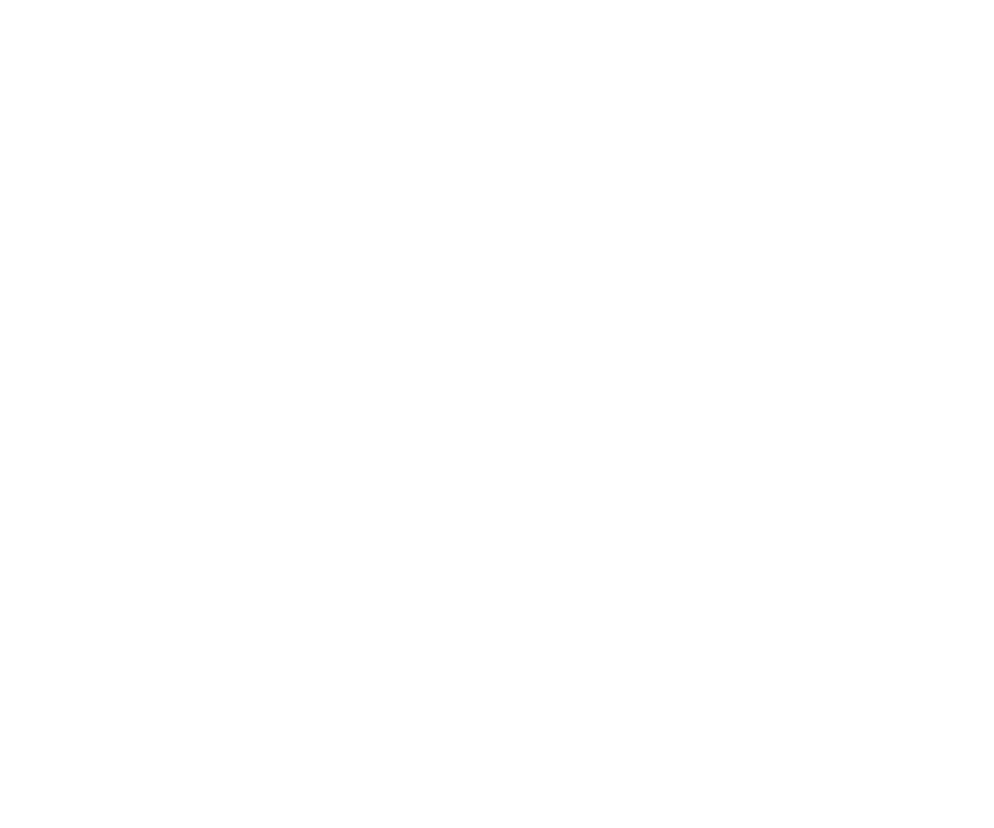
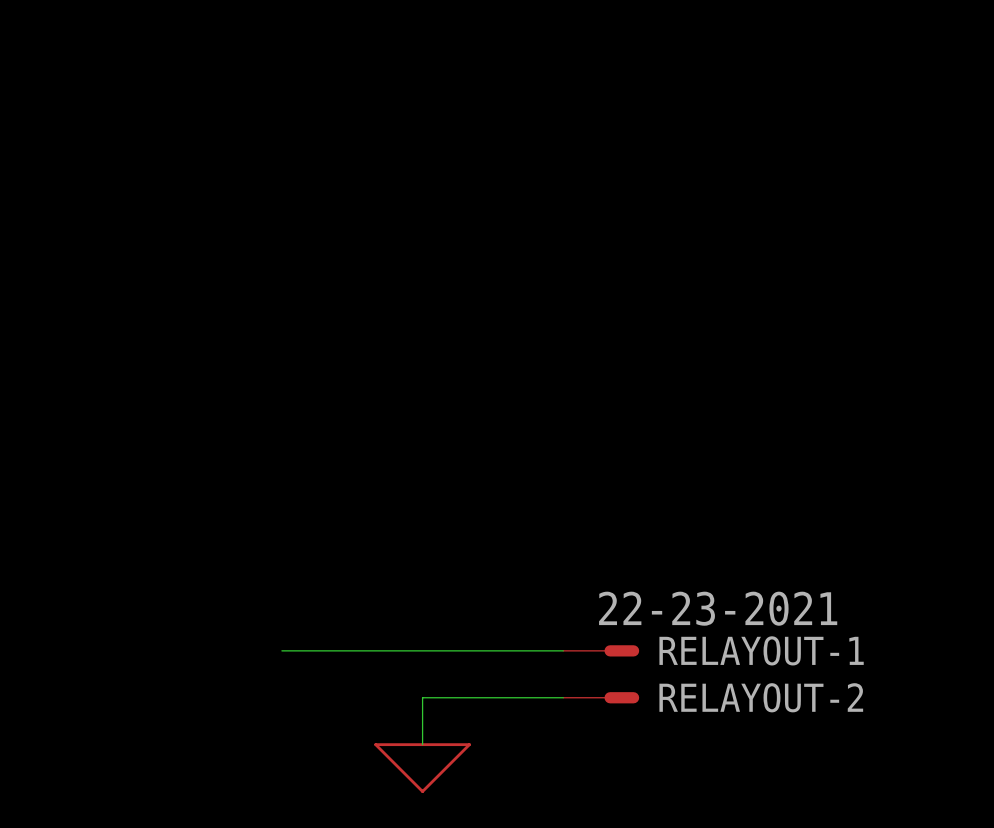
wire: none -> (281, 650) (563, 650)
RELAYOUT-1: none -> 22-23-2021 (601, 650)
wire: none -> (563, 697) (422, 697) (422, 744)
RELAYOUT-2: none -> (601, 697)
power symbol: none -> (422, 768)

